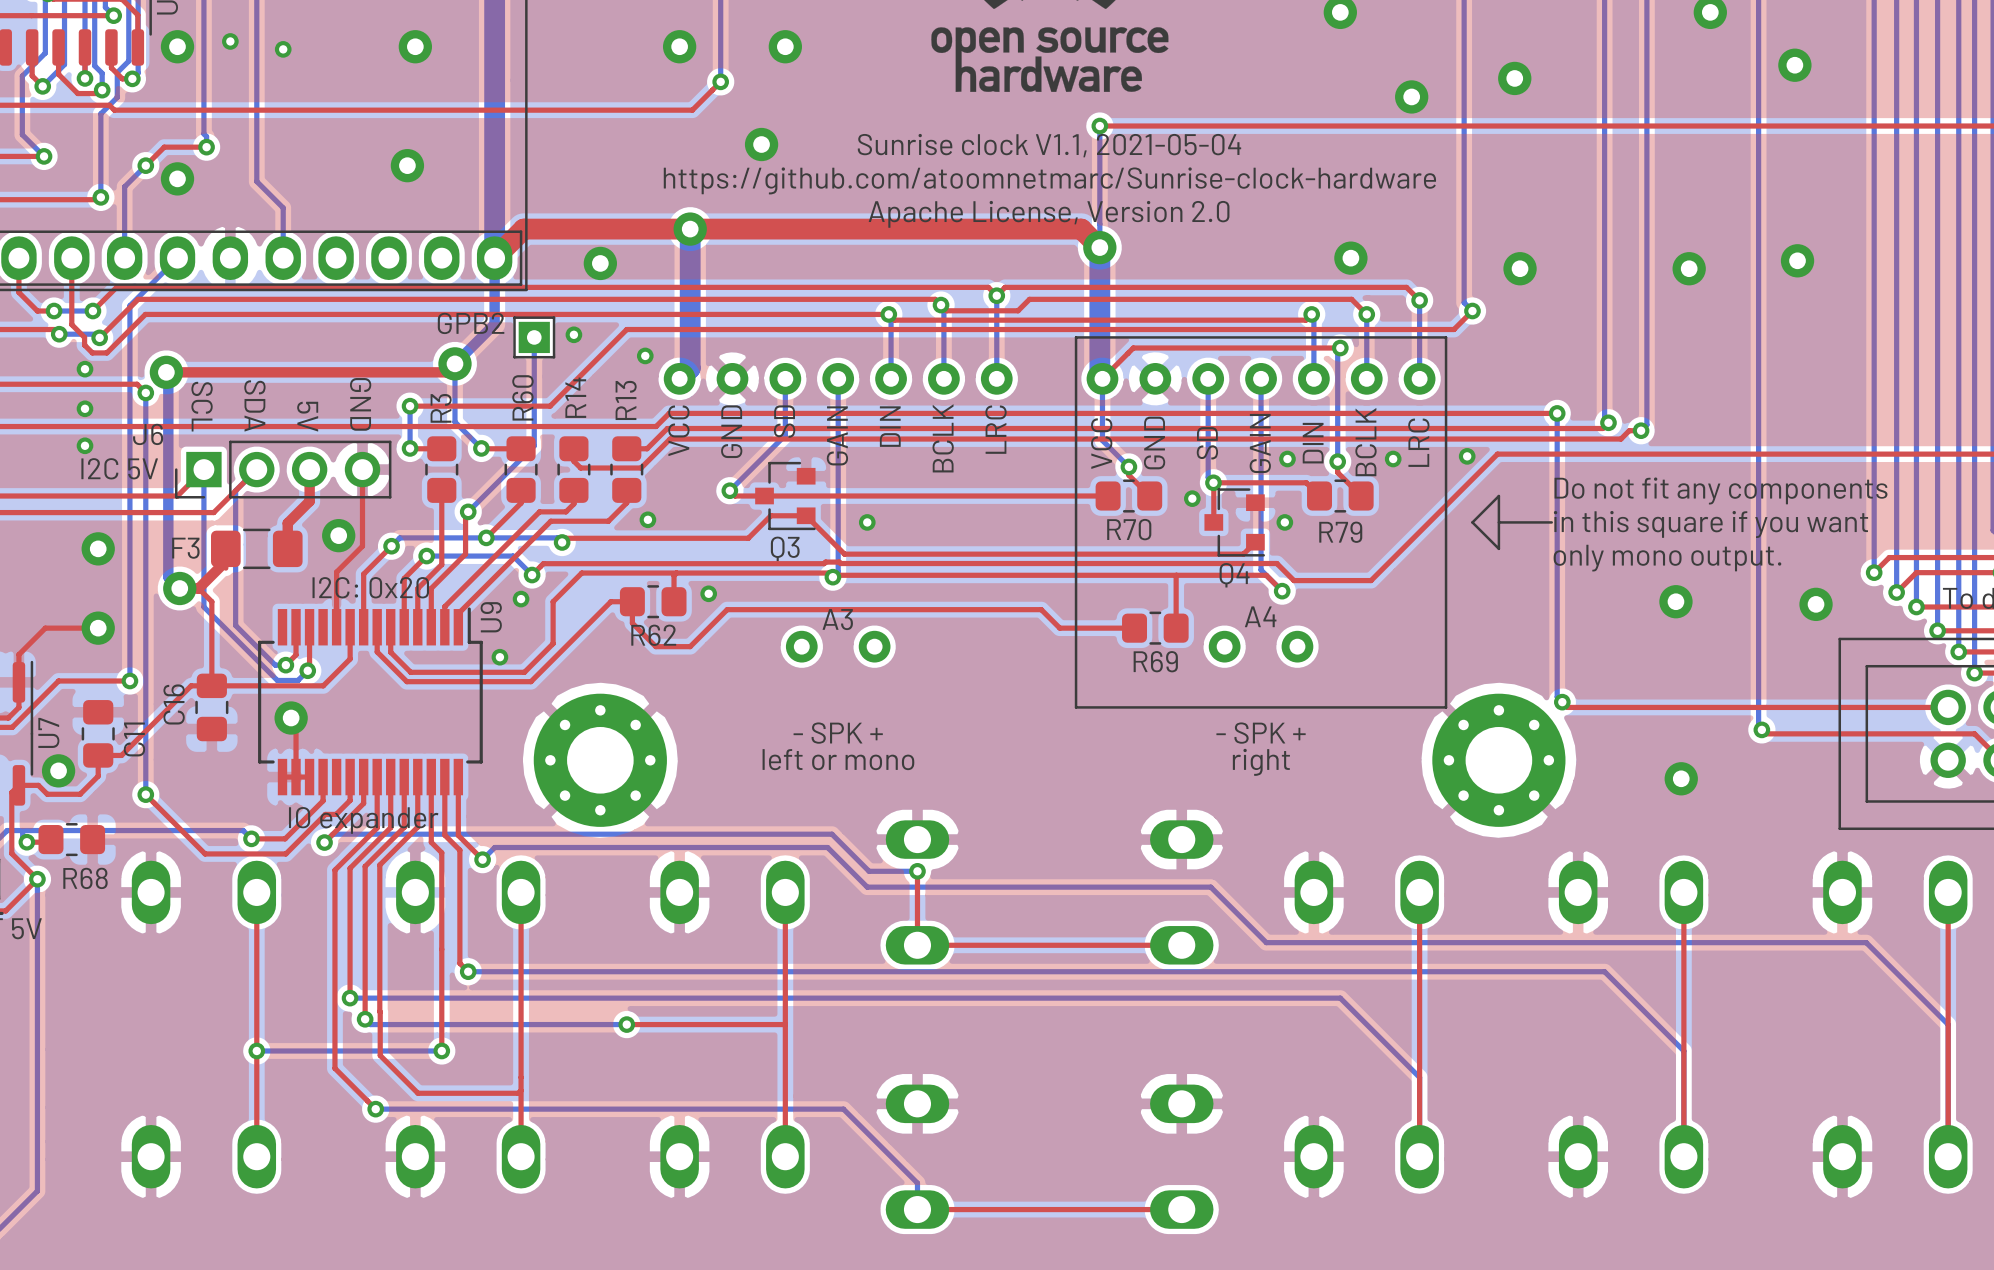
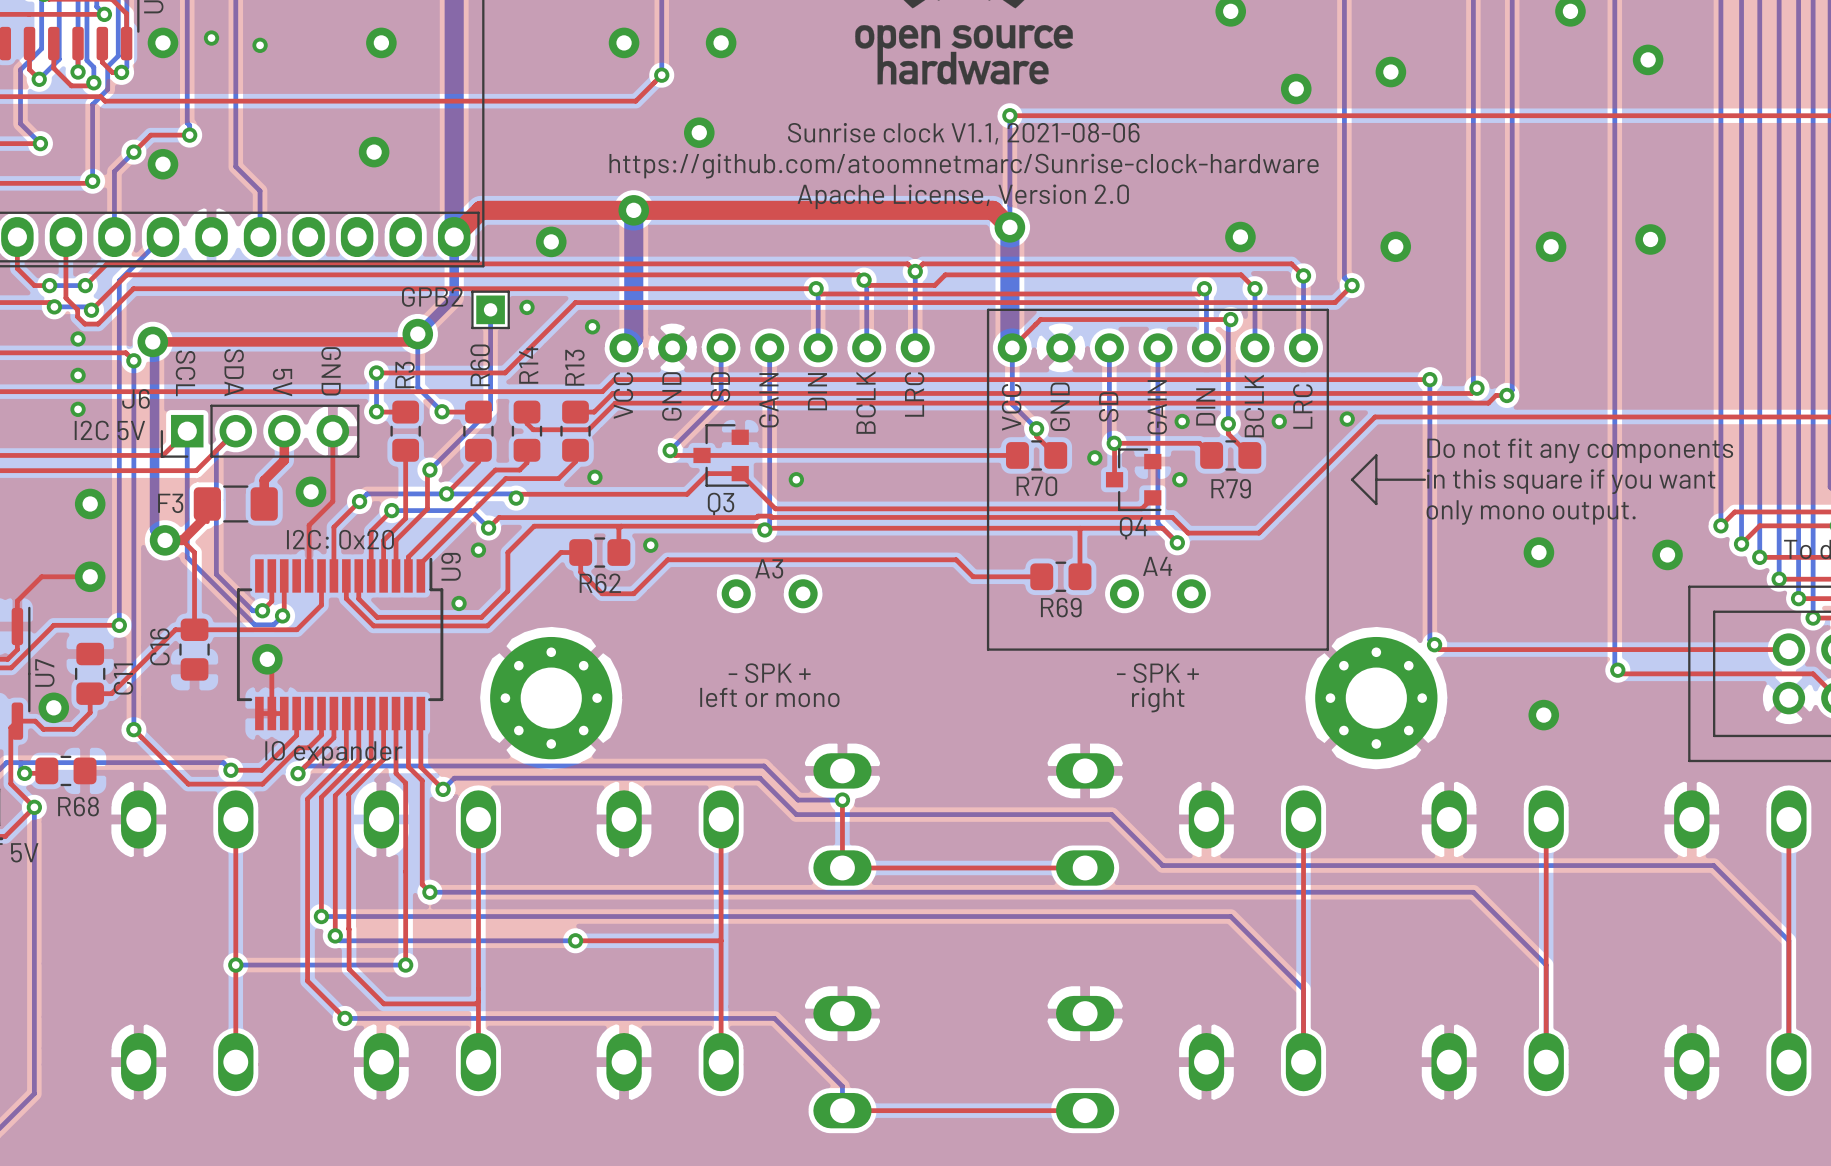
text: Sunrise clock V1.1, 2021-05-04 (1049, 145) -> Sunrise clock V1.1, 2021-08-06 (963, 133)

